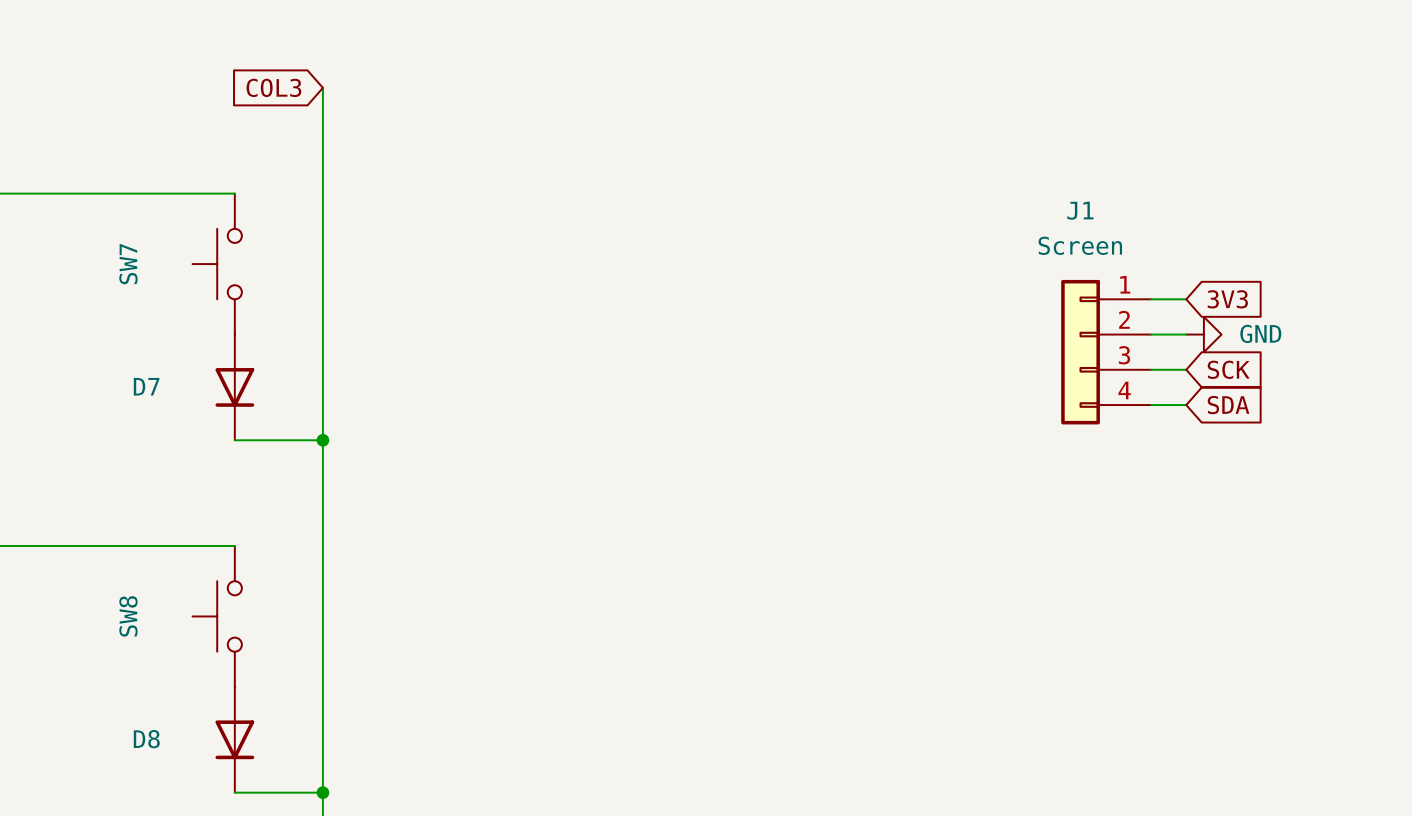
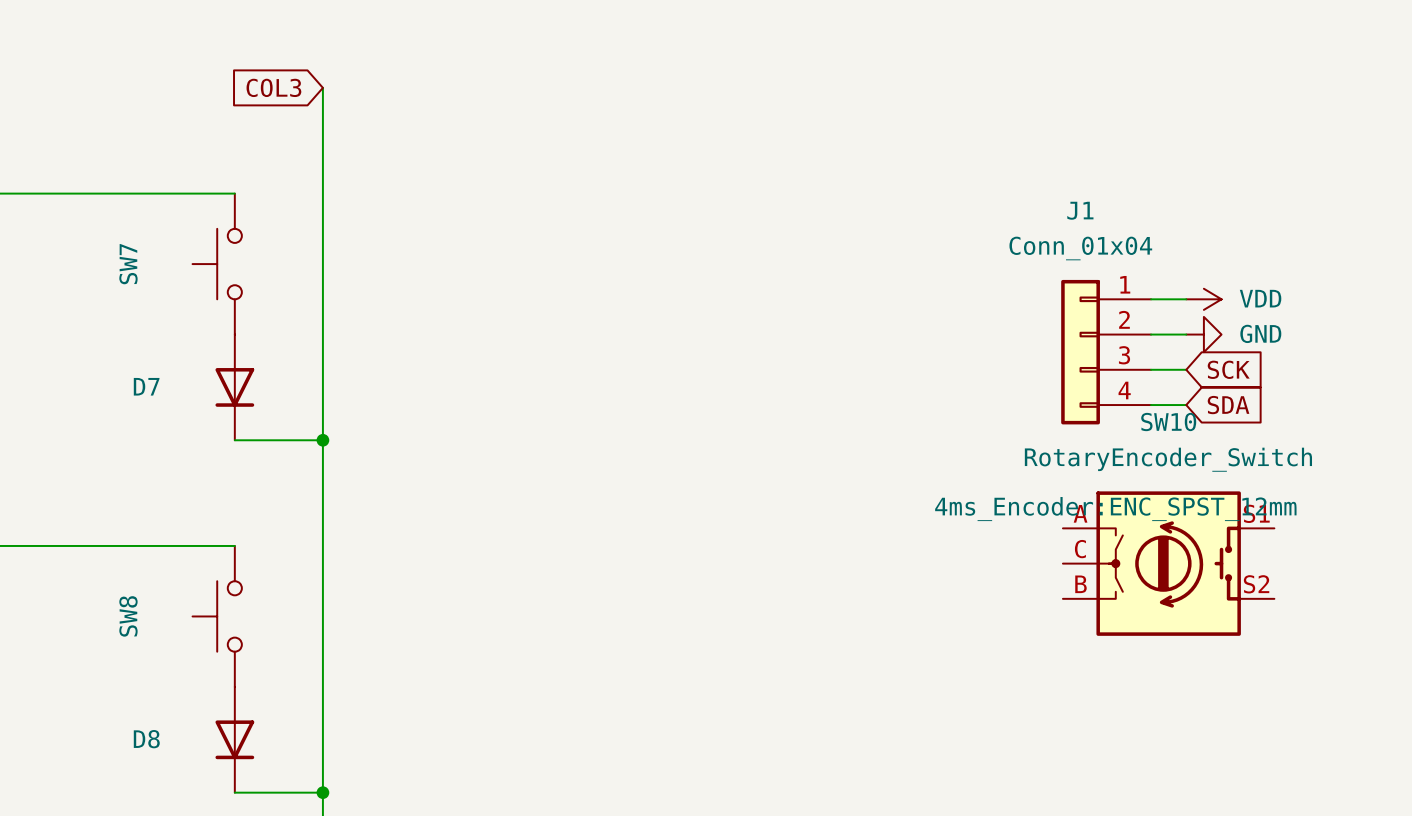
J1 value: Screen (1080, 245) -> Conn_01x04 (1080, 248)
power symbol: none -> VDD (1203, 299)
global label: 3V3 (1227, 299) -> none
SW10: none -> RotaryEncoder_Switch (1168, 563)

